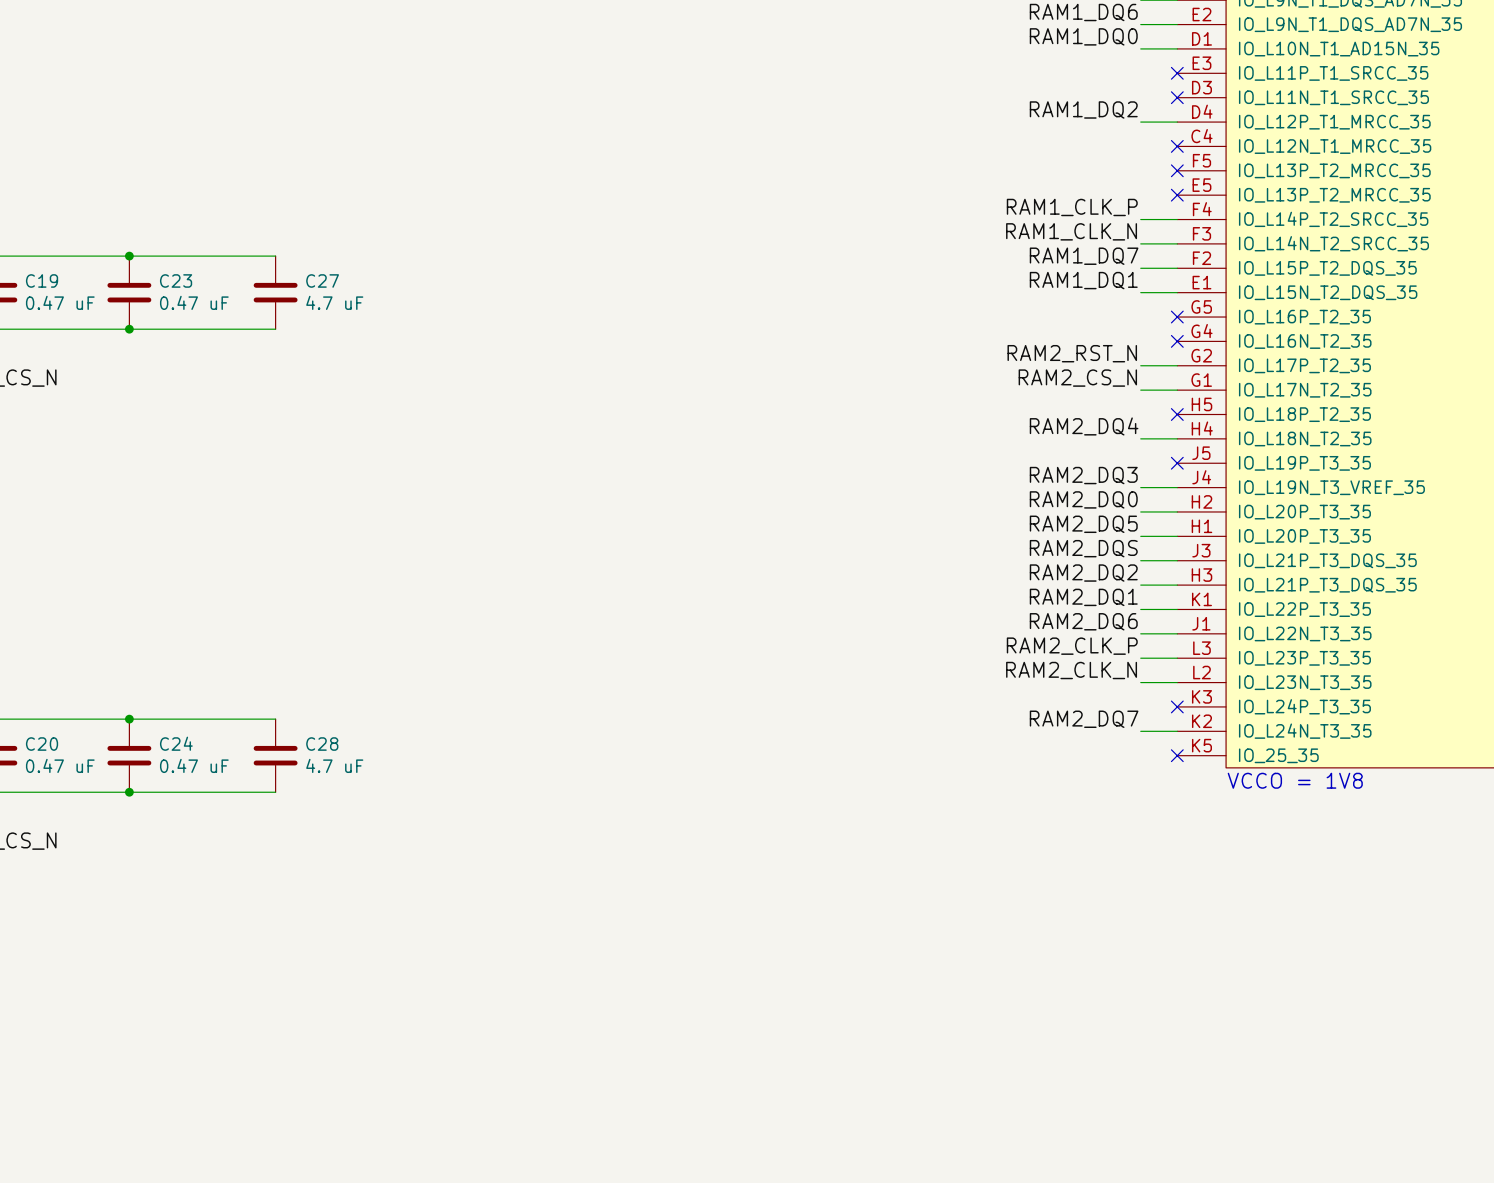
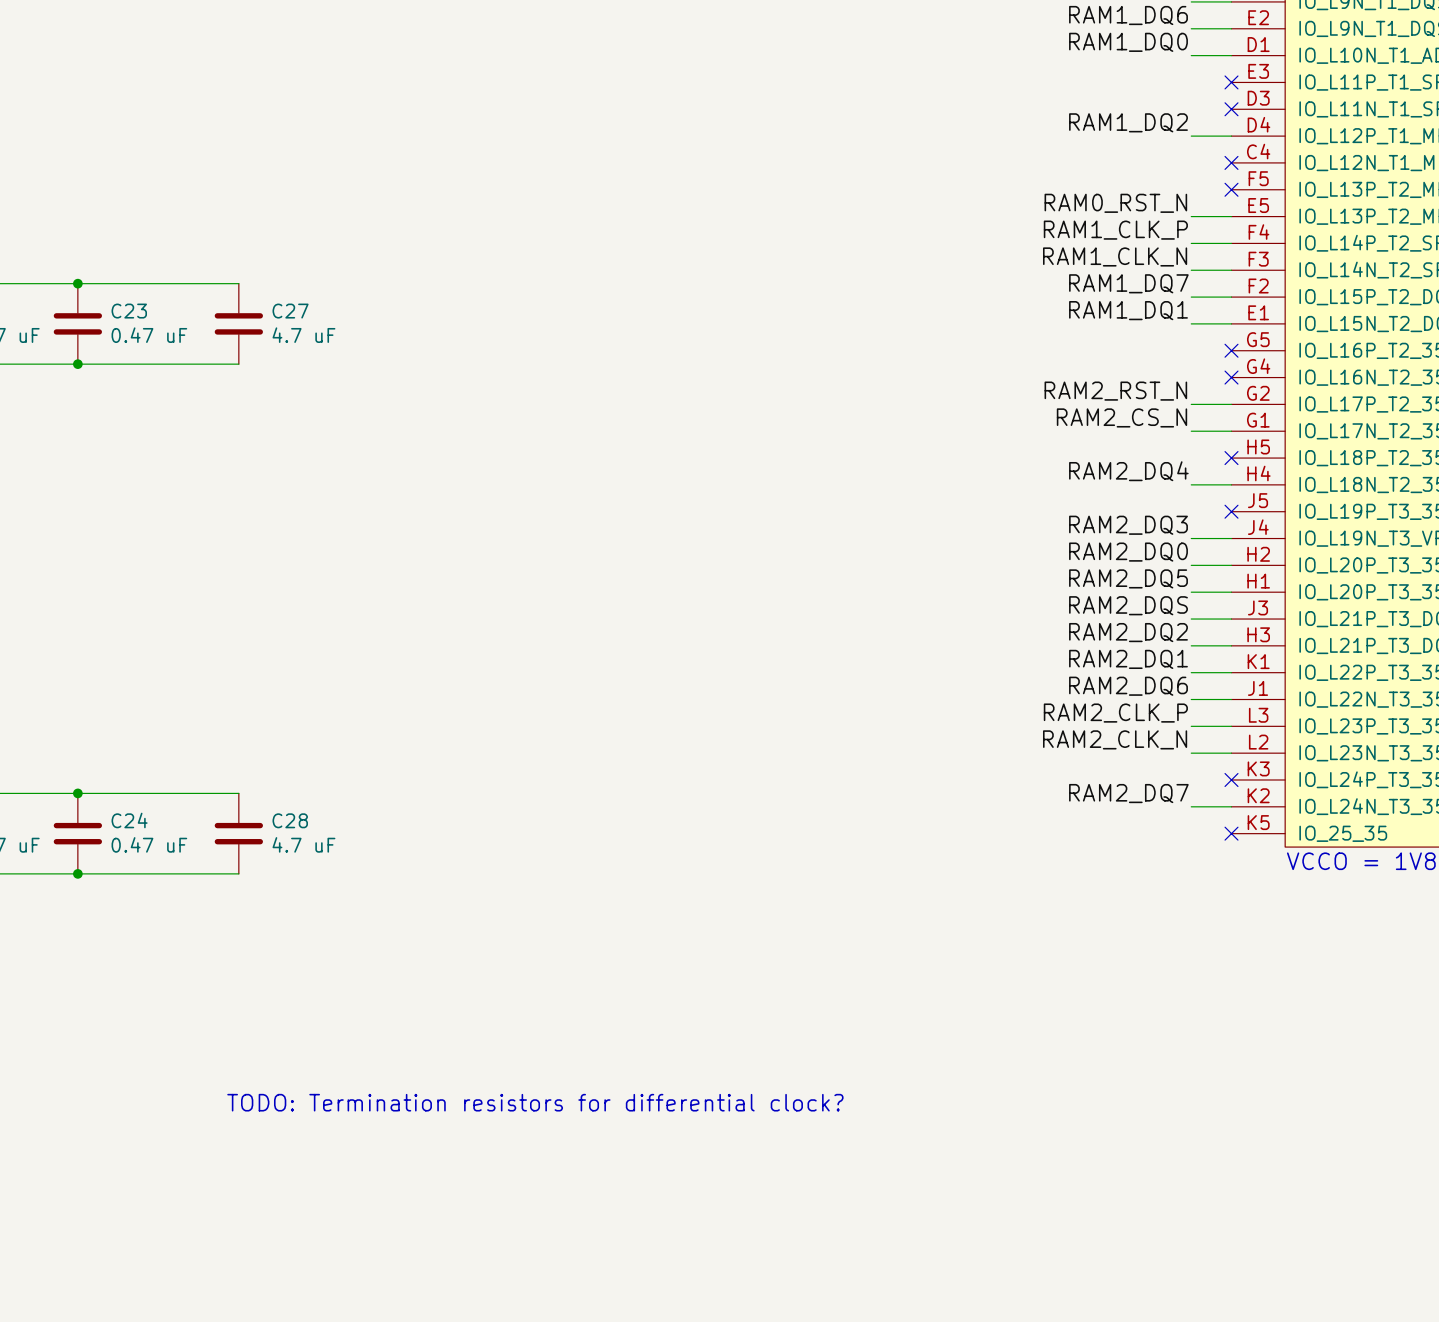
label: none -> RAM0_RST_N (1115, 203)
wire: none -> (1191, 216) (1231, 216)
no-connect mark: (1177, 195) -> none
text: none -> TODO: Termination resistors for differential clock? (535, 1102)

